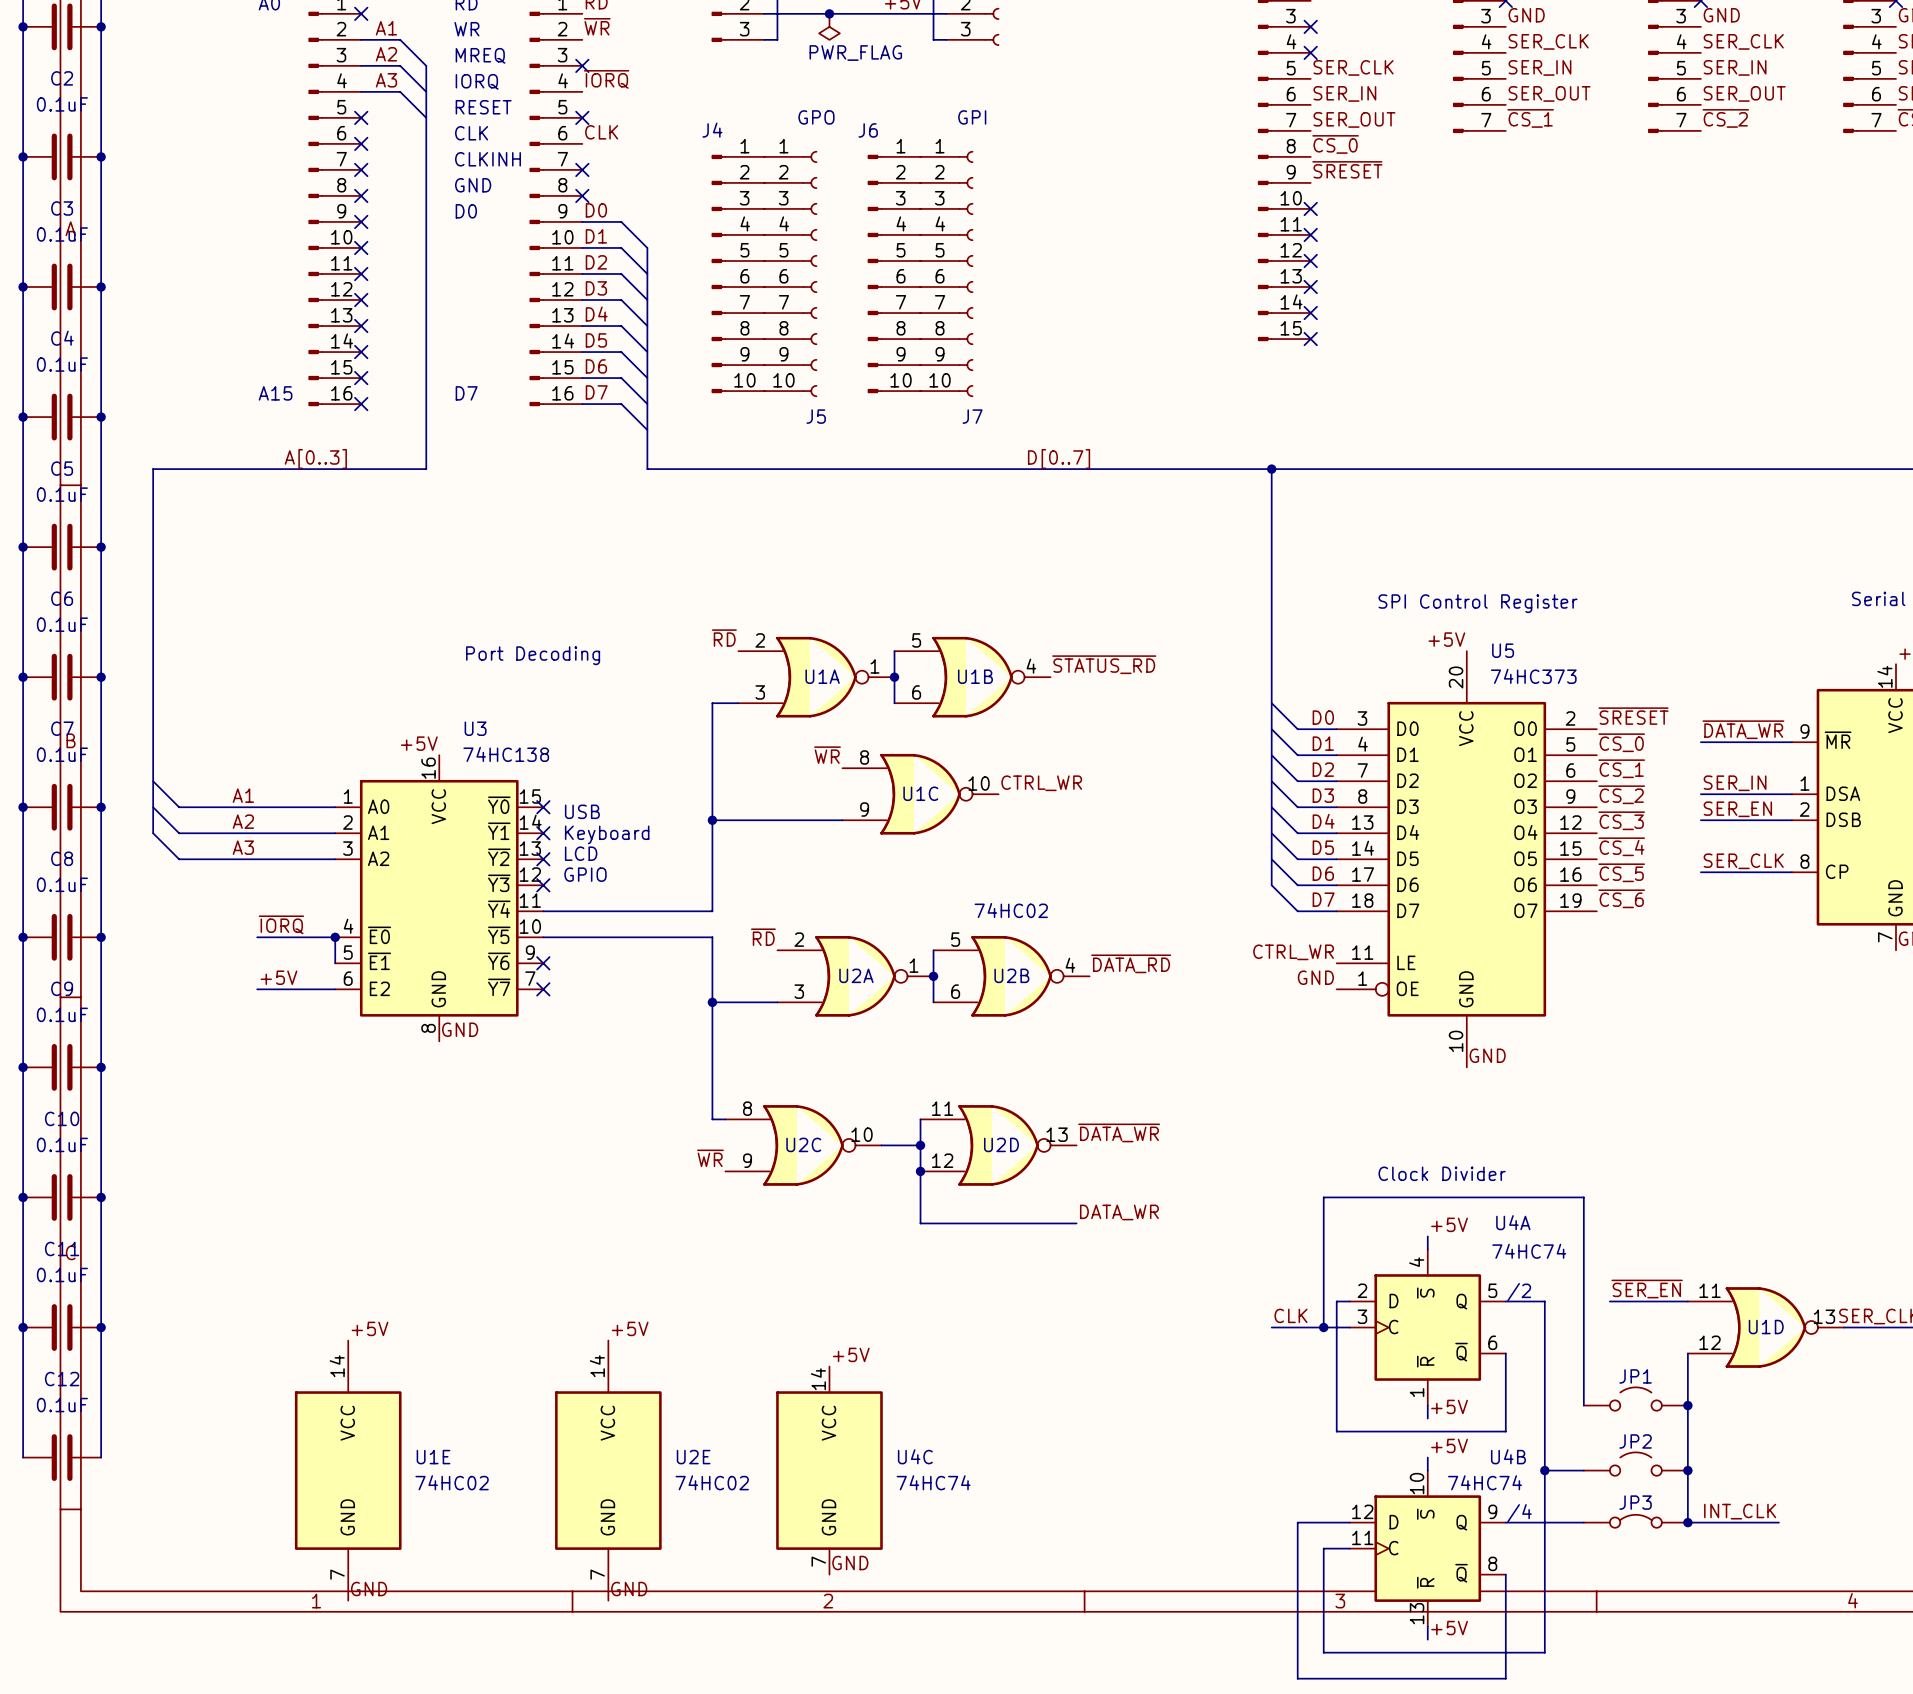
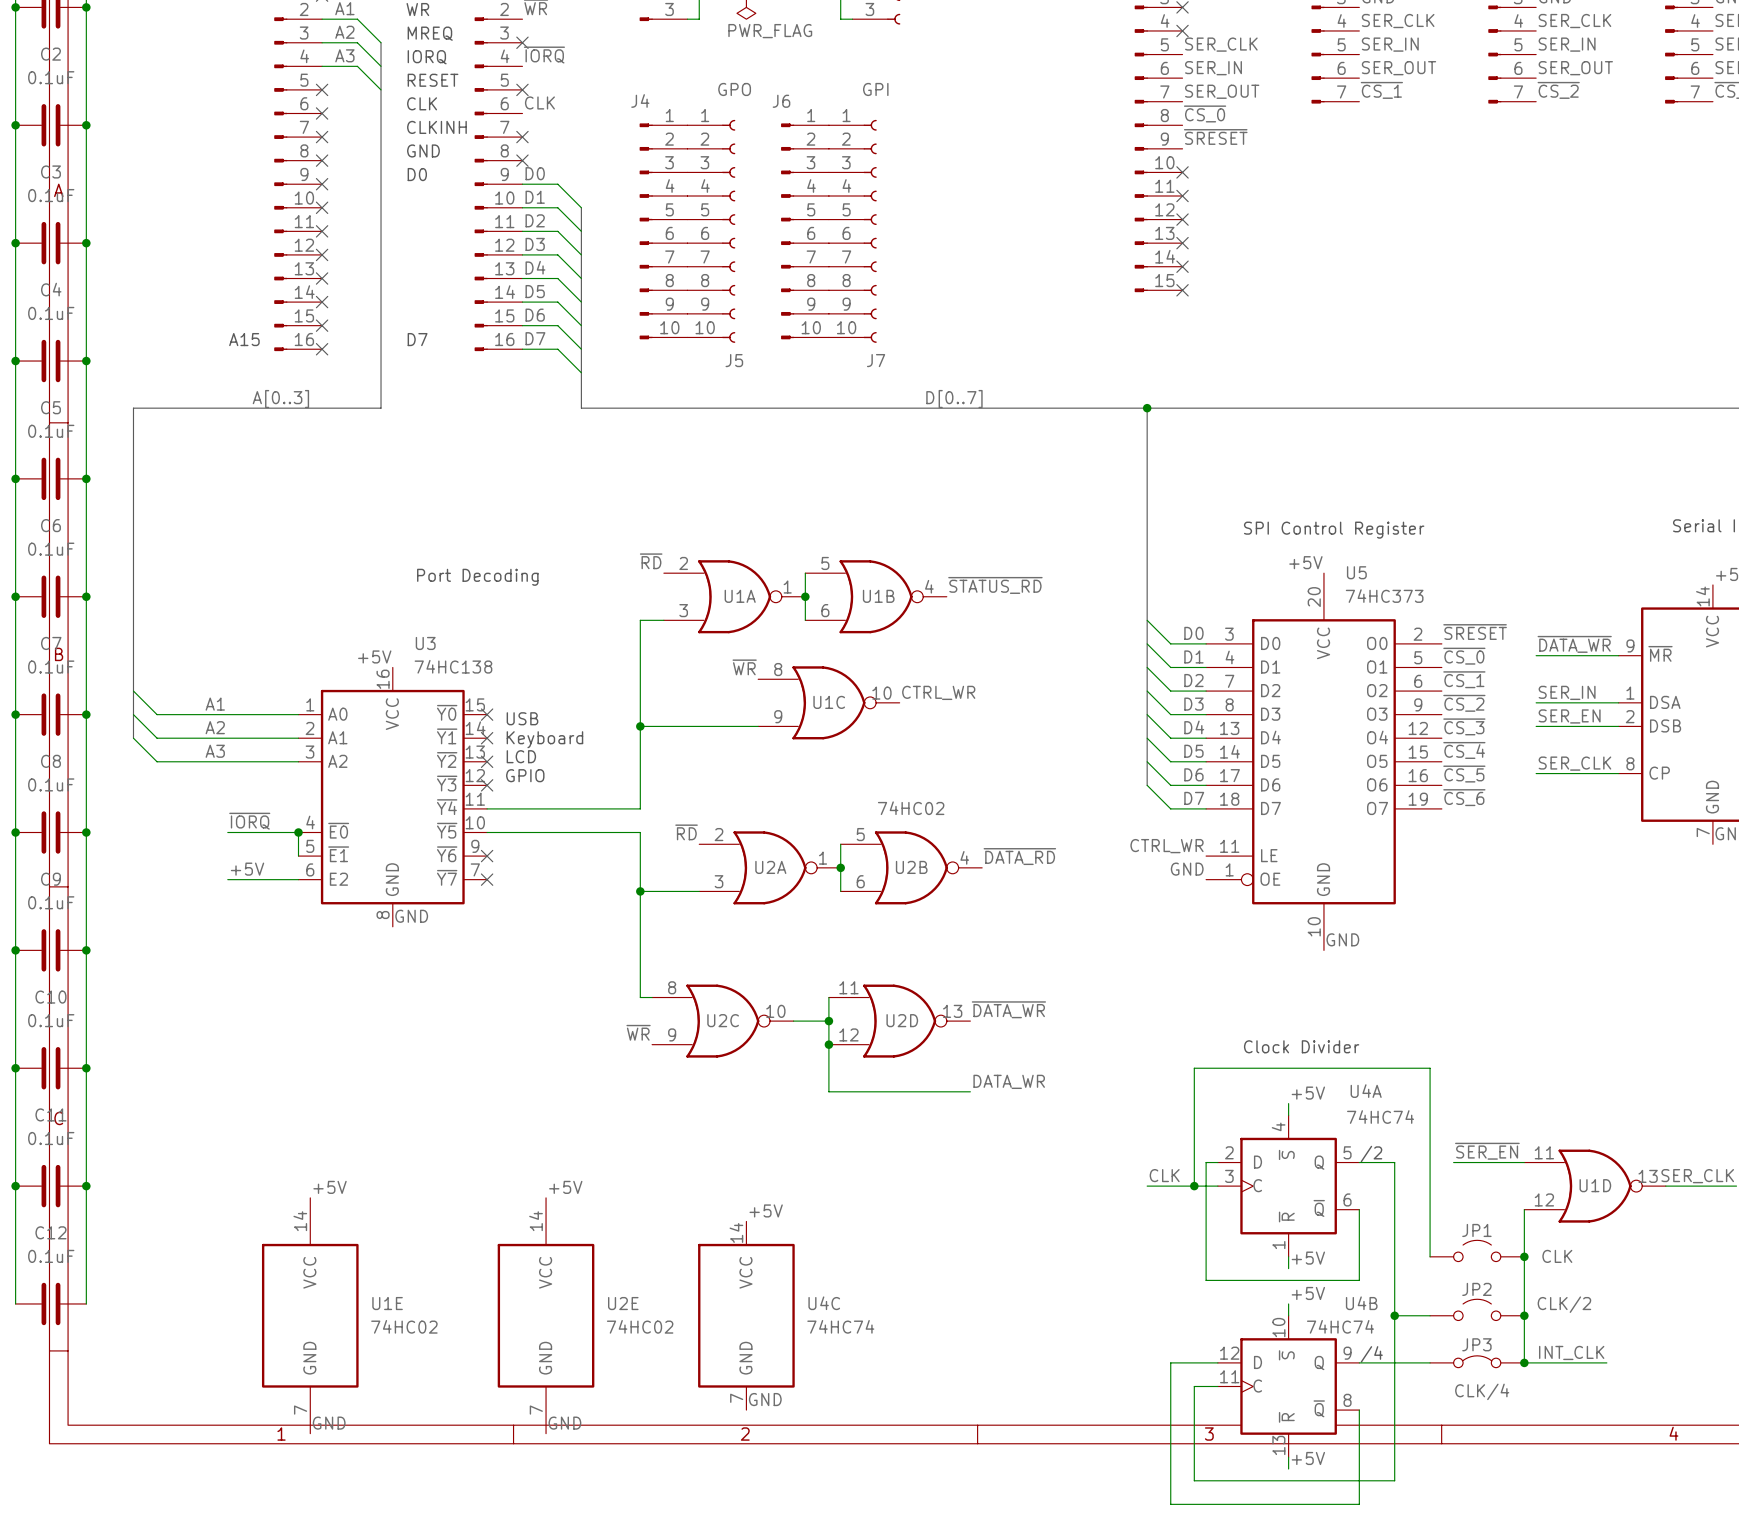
JP1 value: none -> CLK (1557, 1256)
JP2 value: none -> CLK/2 (1564, 1304)
JP3 value: none -> CLK/4 (1482, 1391)

